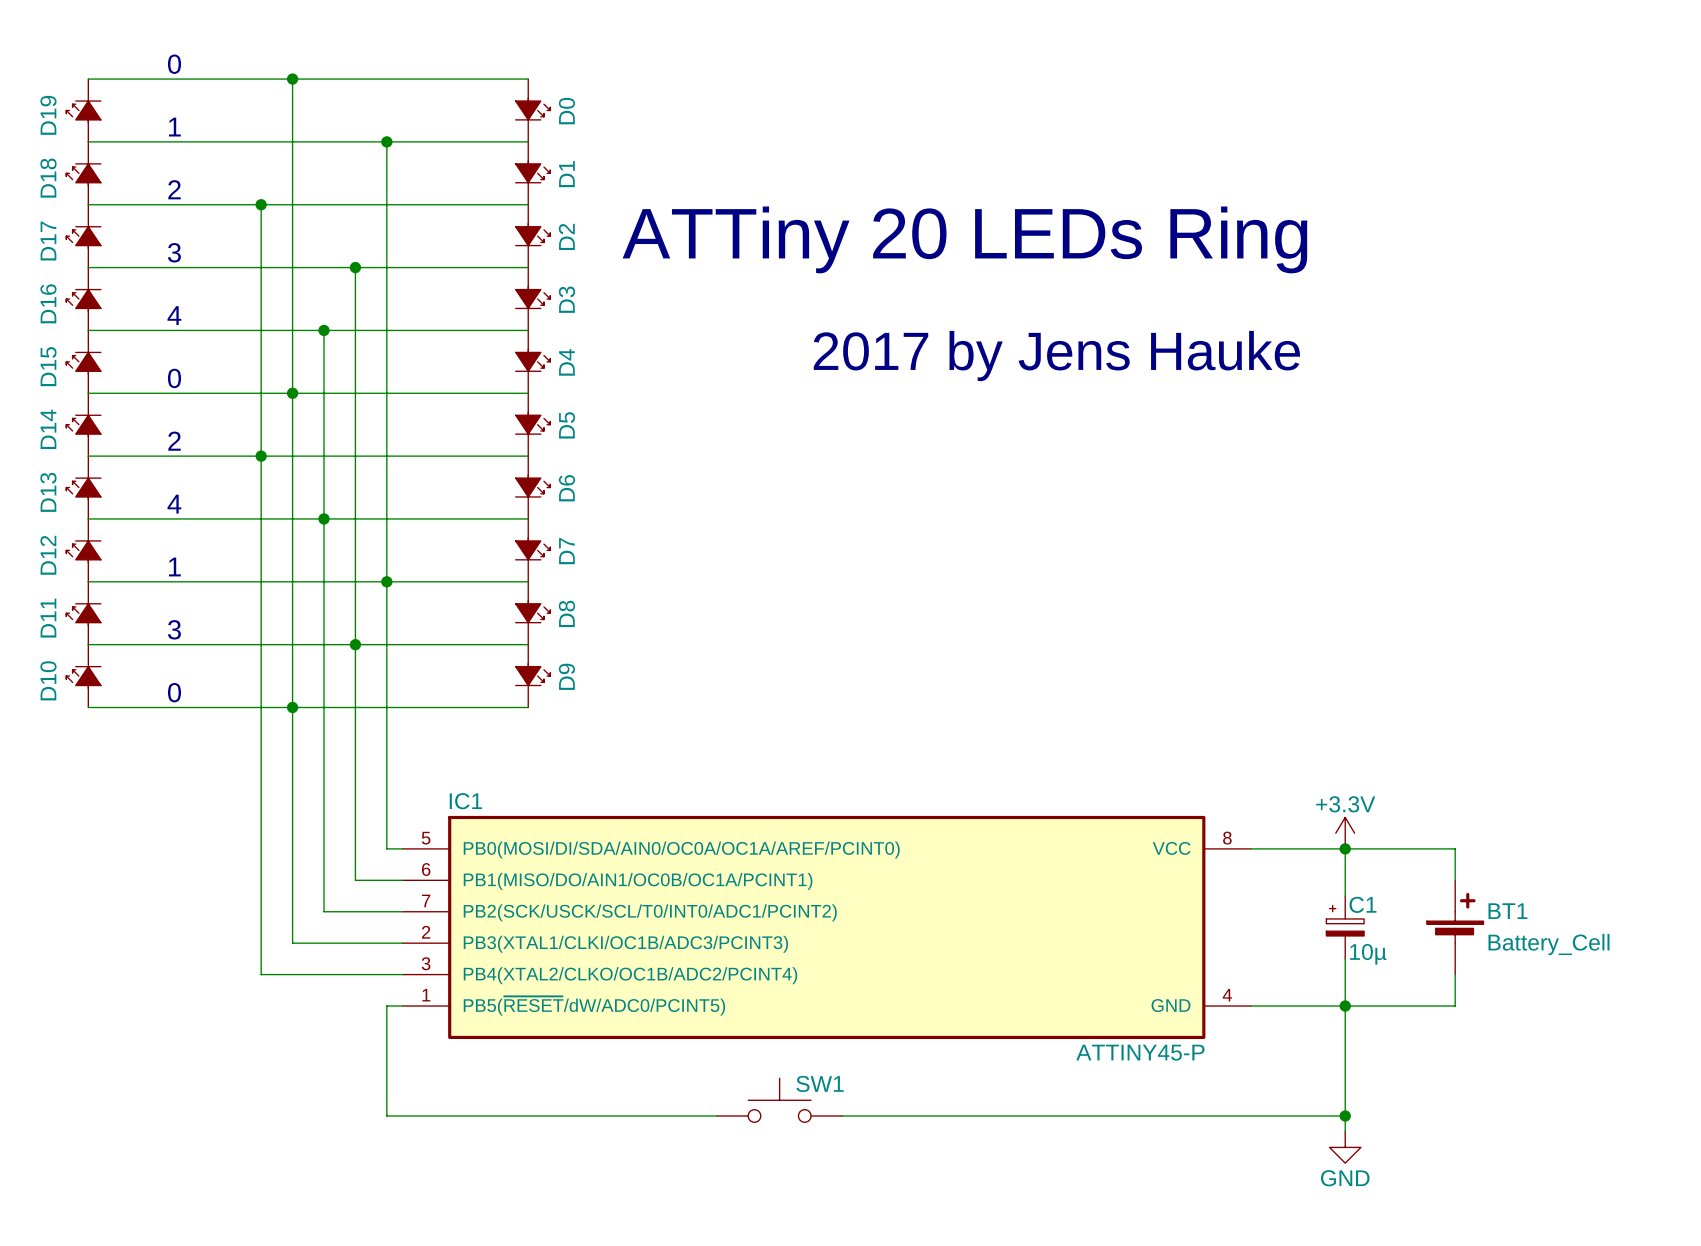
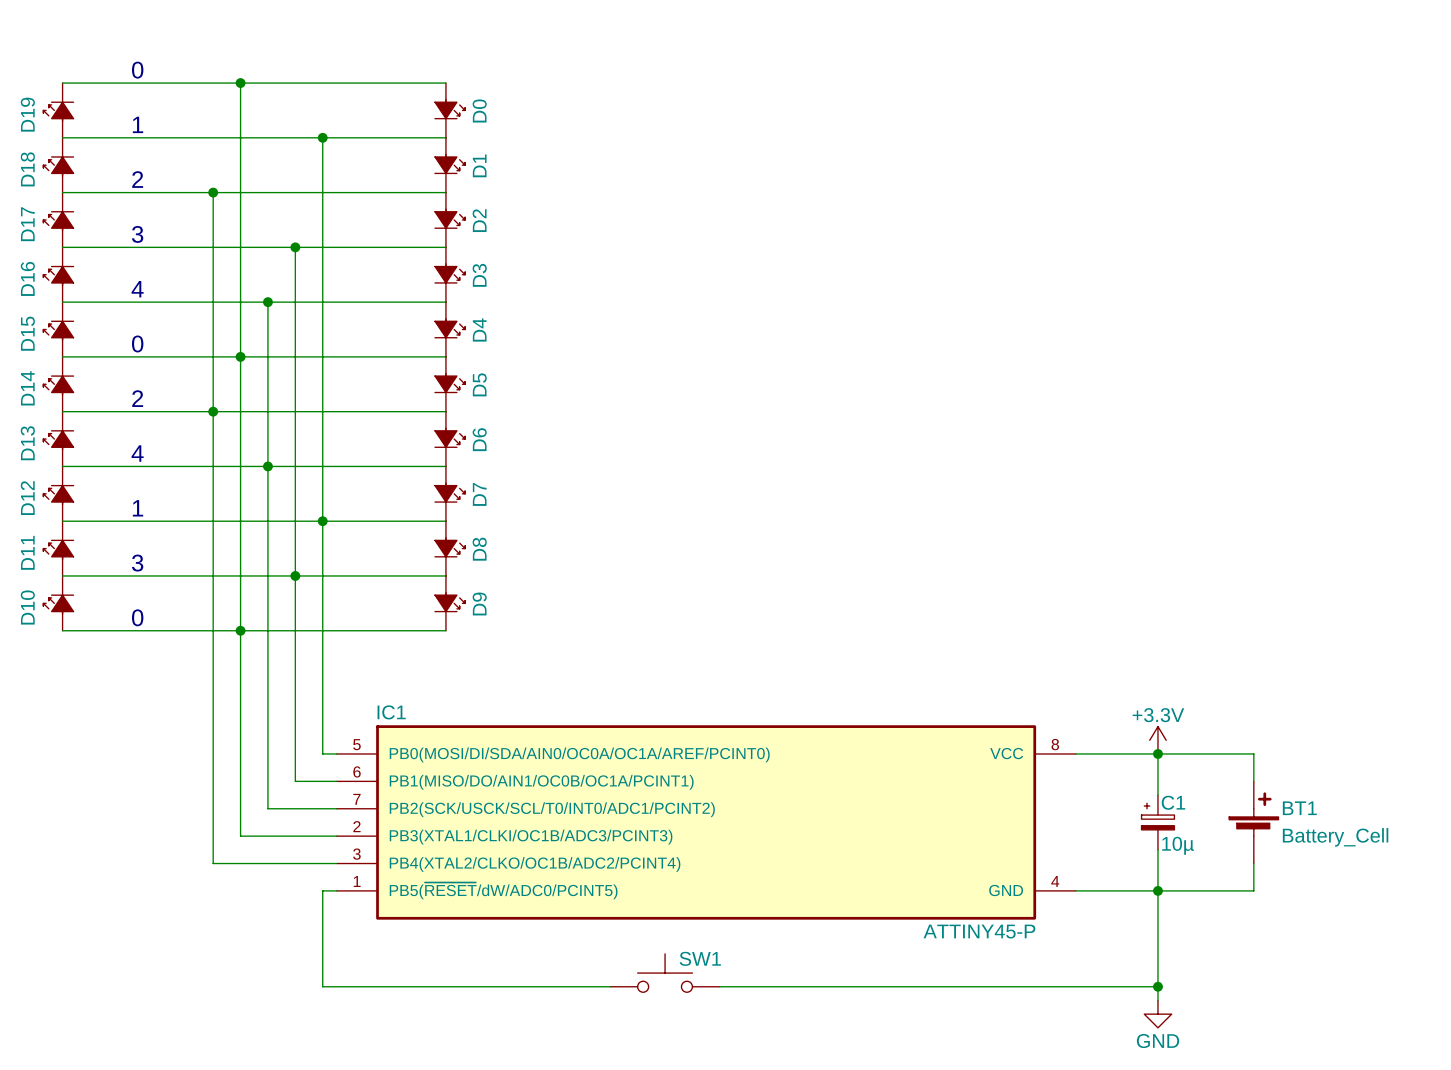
text: ATTiny 20 LEDs Ring (965, 239) -> none
text: 2017 by Jens Hauke (1056, 355) -> none

